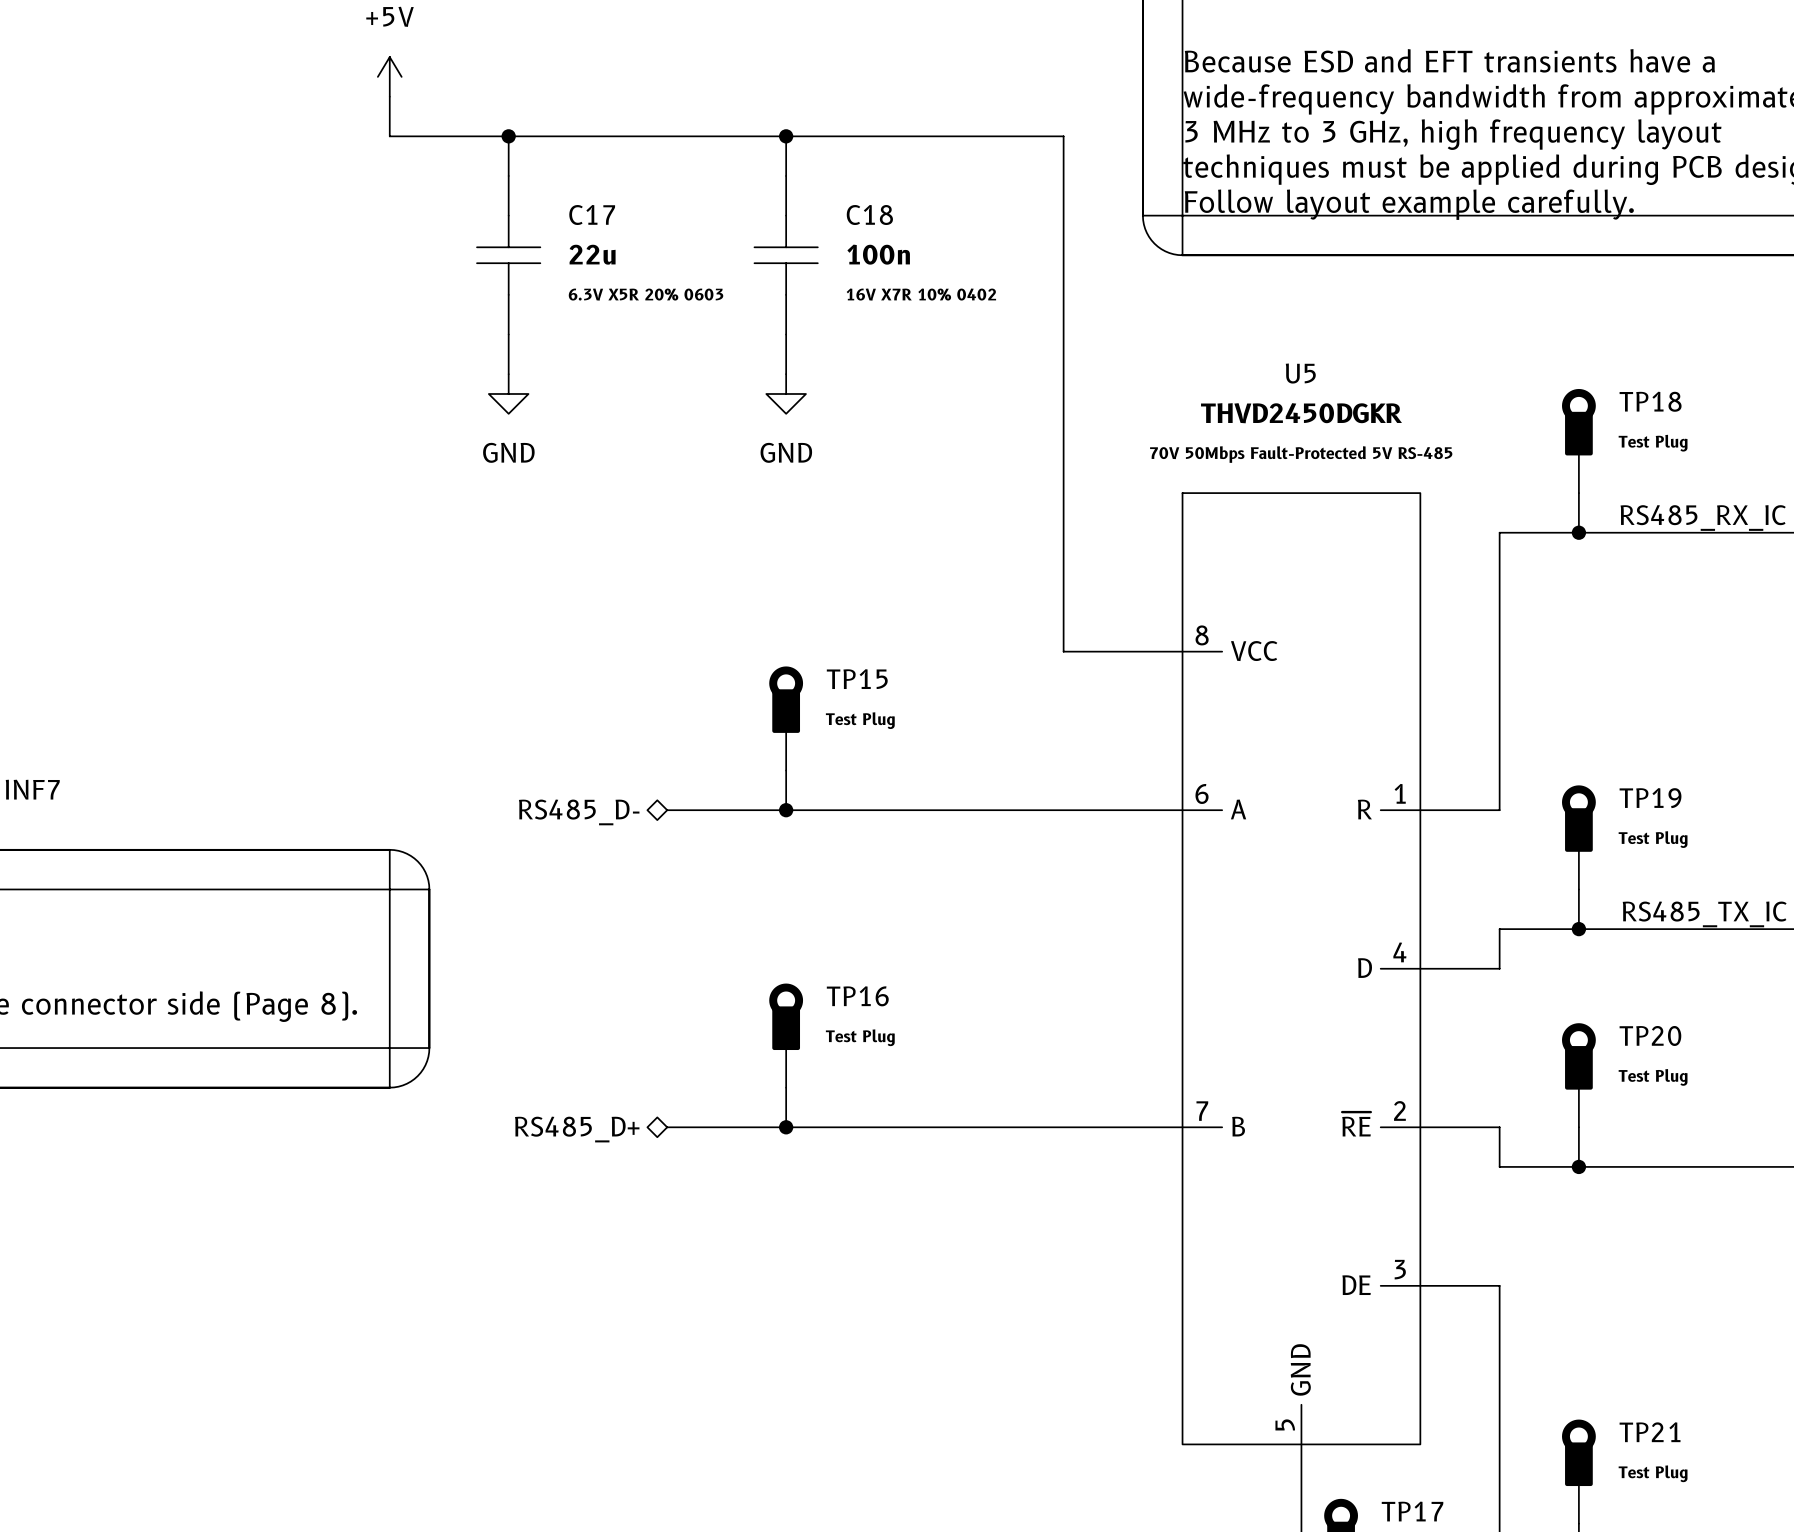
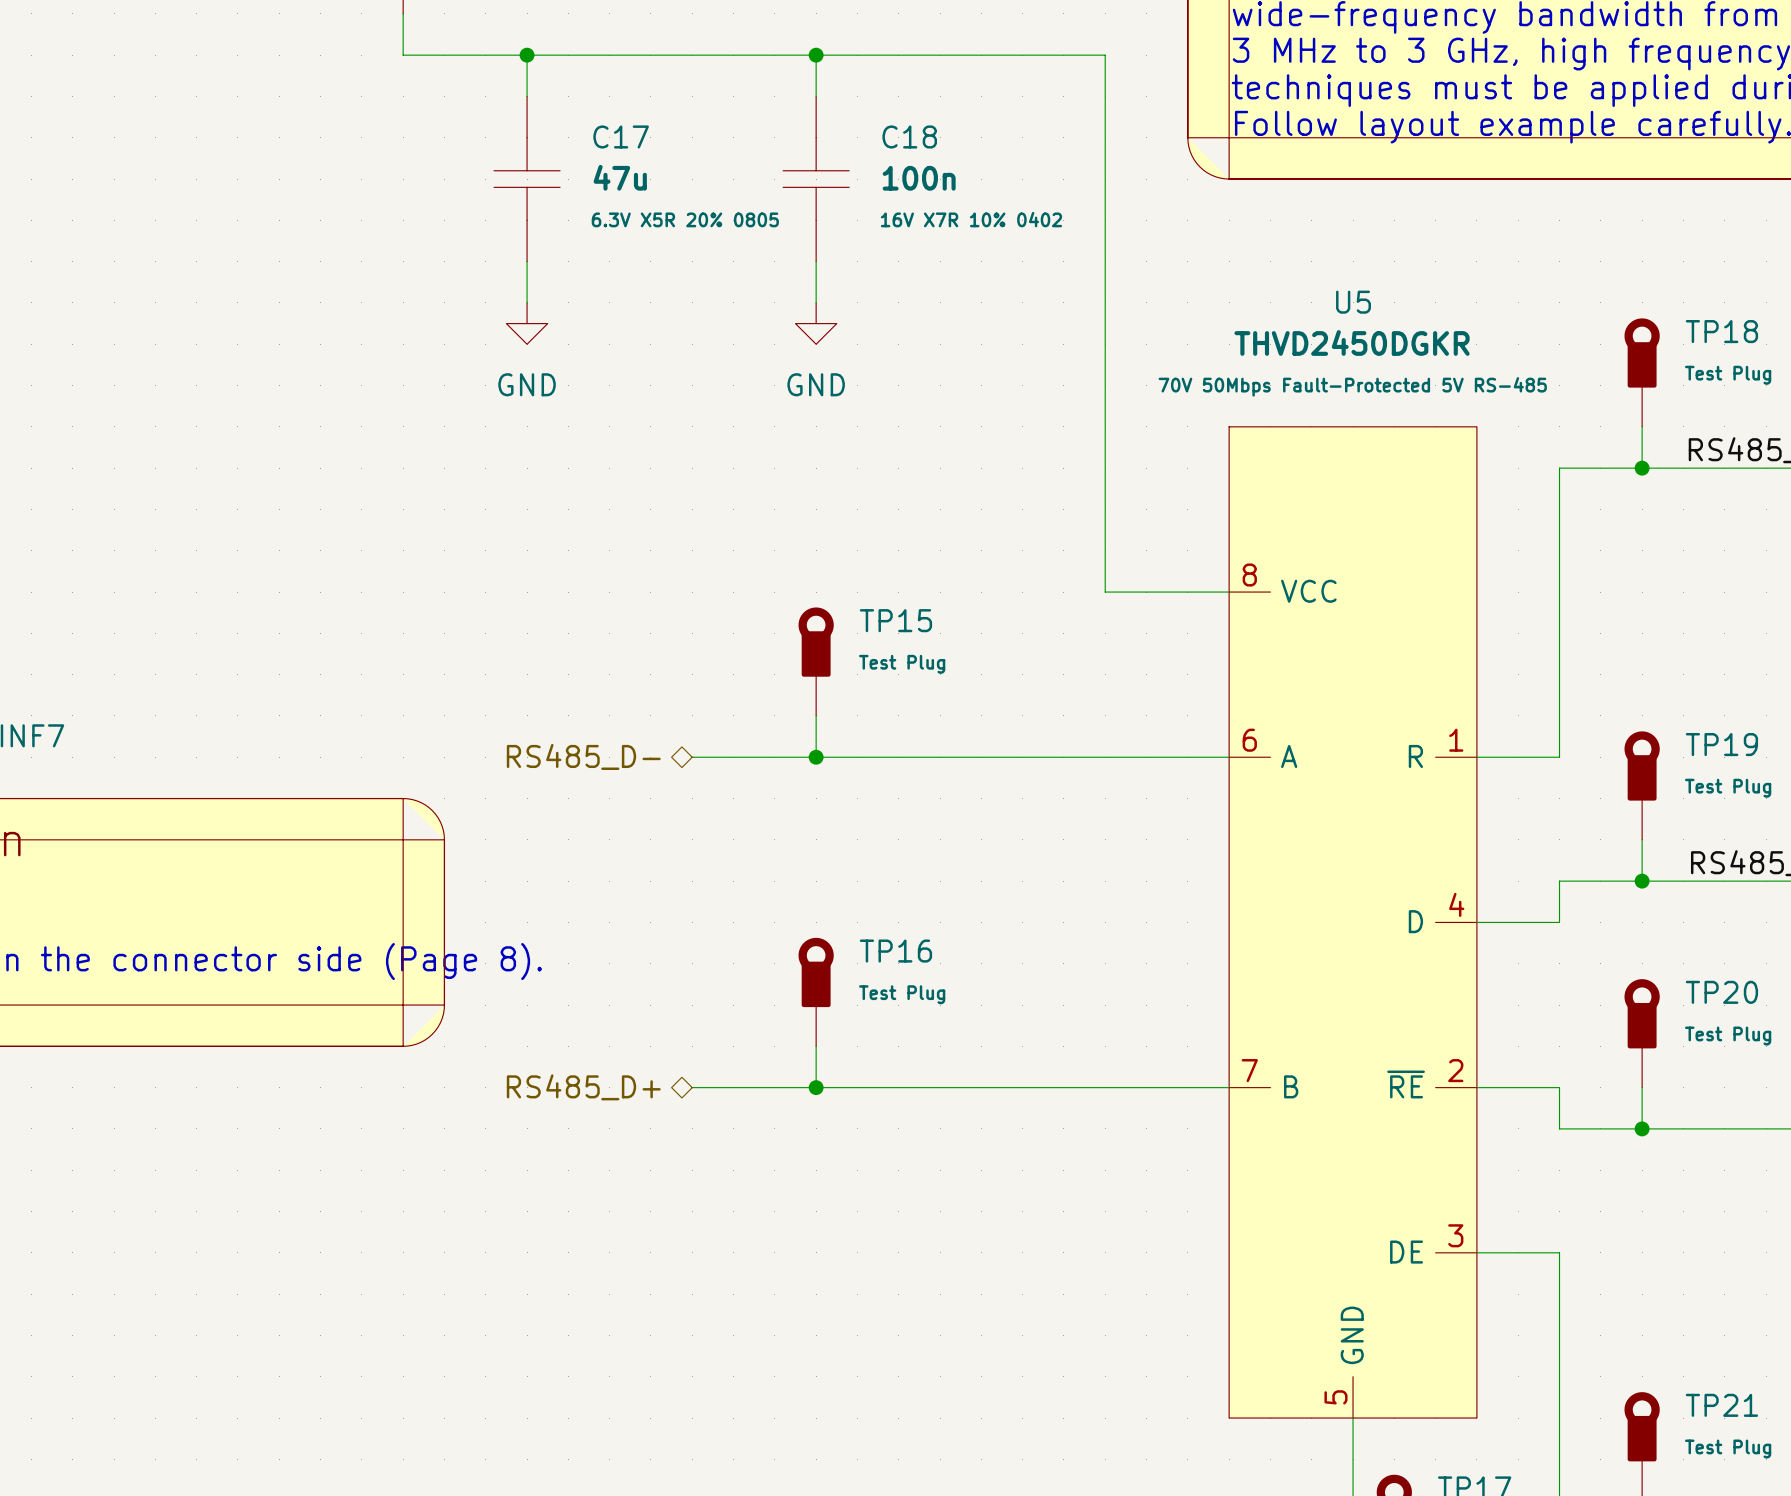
C17 value: 22u (592, 254) -> 47u (620, 177)
C17 text: 6.3V X5R 20% 0603 (646, 294) -> 6.3V X5R 20% 0805 (685, 219)

